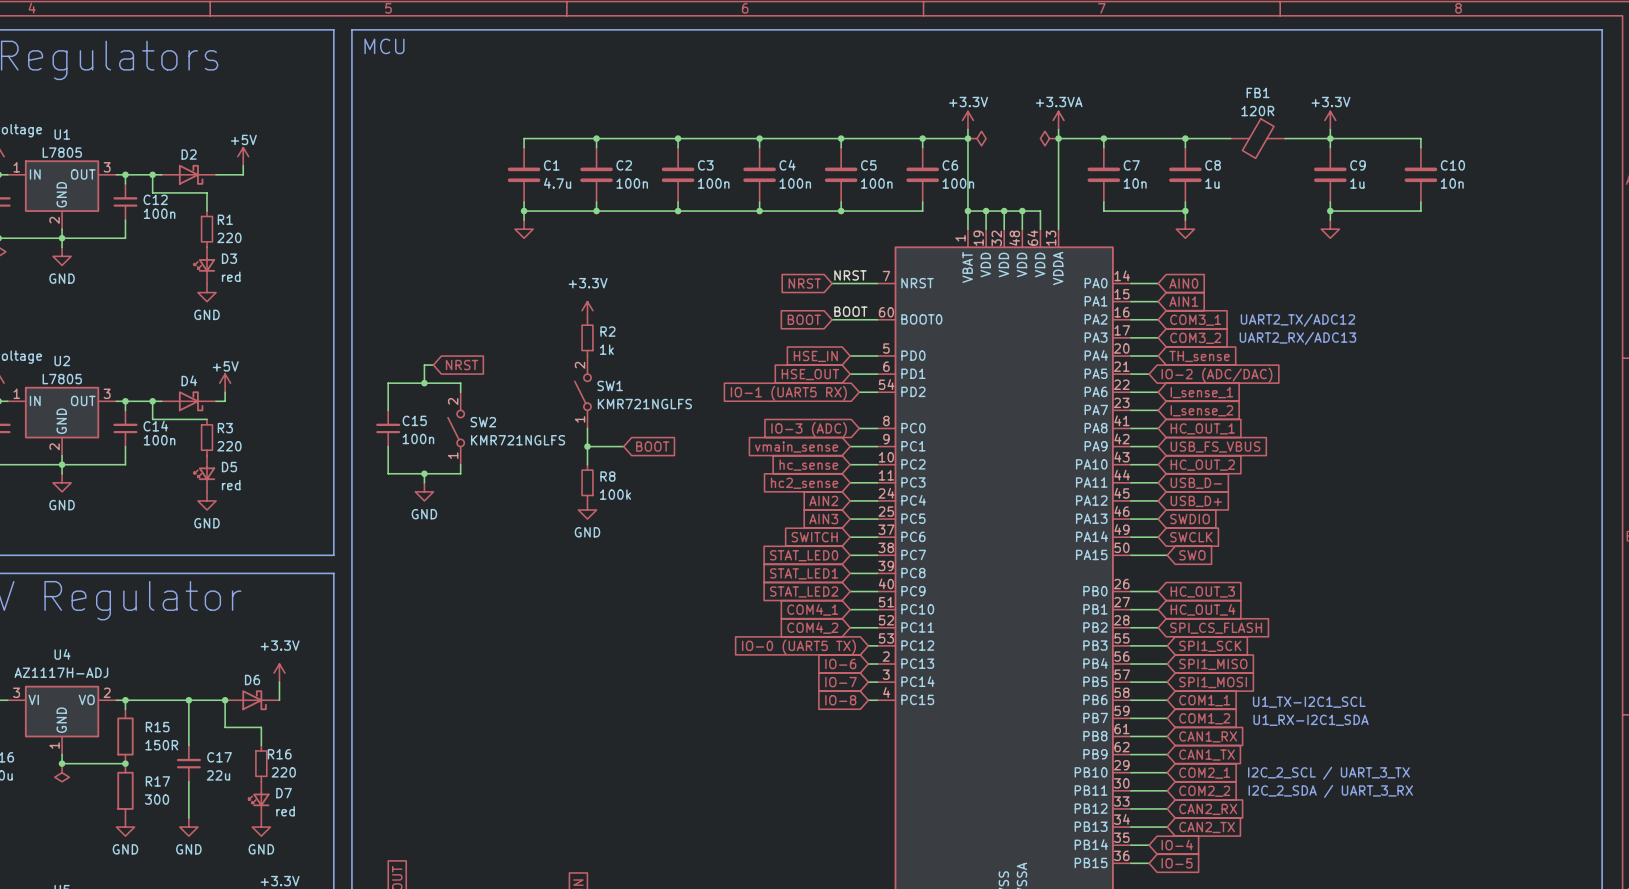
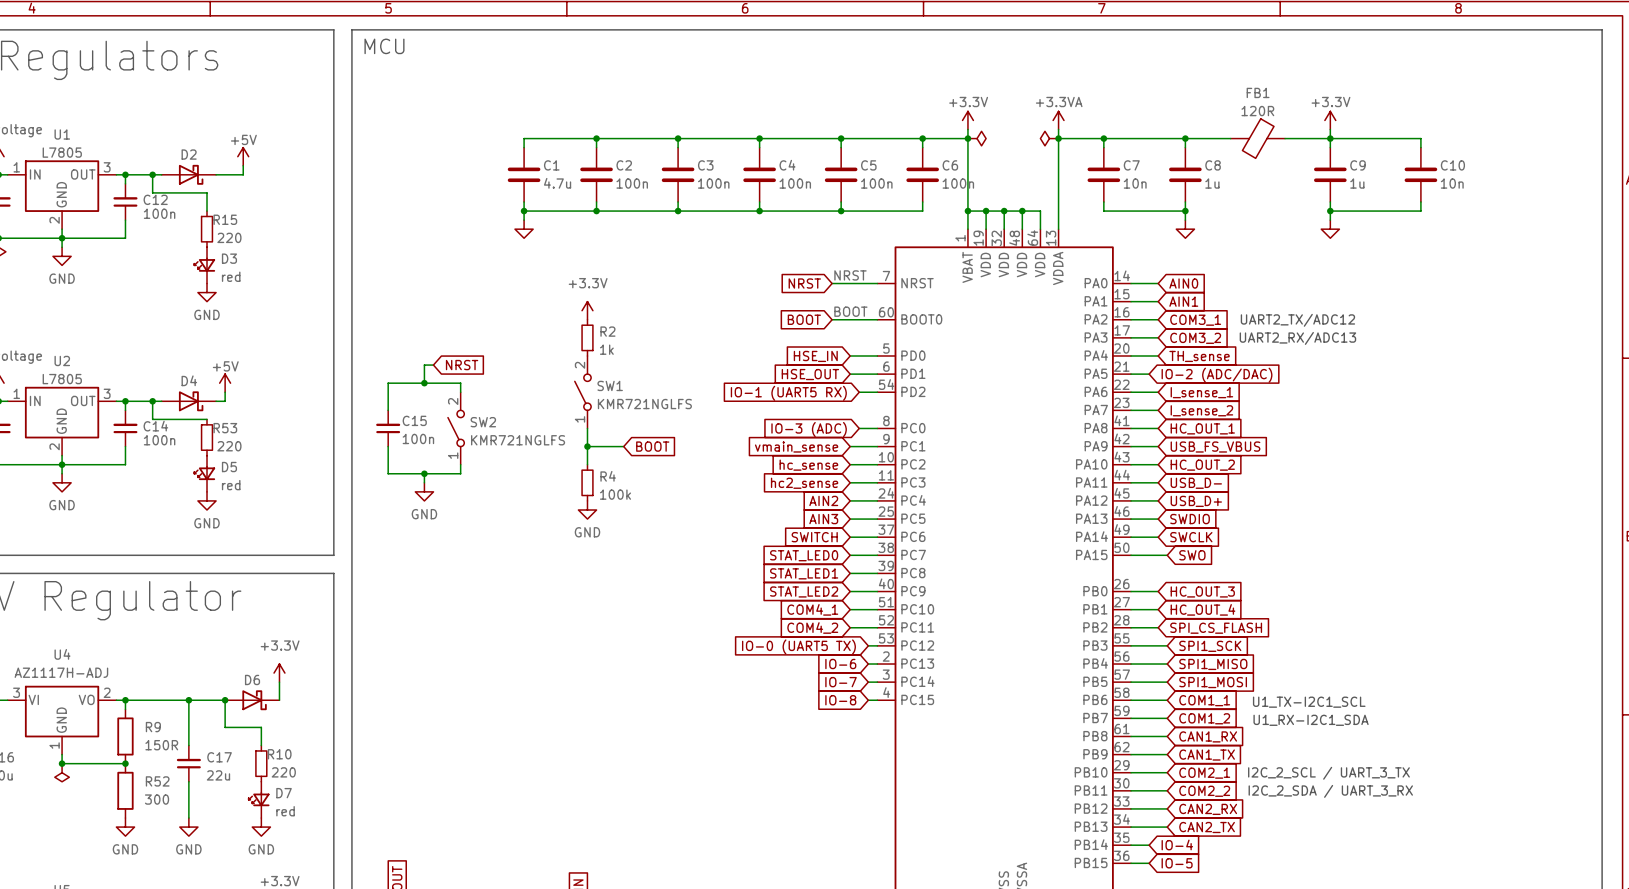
R1 name: R1 (225, 219) -> R15 (225, 219)
R3 name: R3 (225, 428) -> R53 (225, 428)
R8 name: R8 (607, 476) -> R4 (608, 476)
R15 name: R15 (157, 727) -> R9 (153, 727)
R16 name: R16 (279, 754) -> R10 (279, 754)
R17 name: R17 (157, 781) -> R52 (157, 781)

